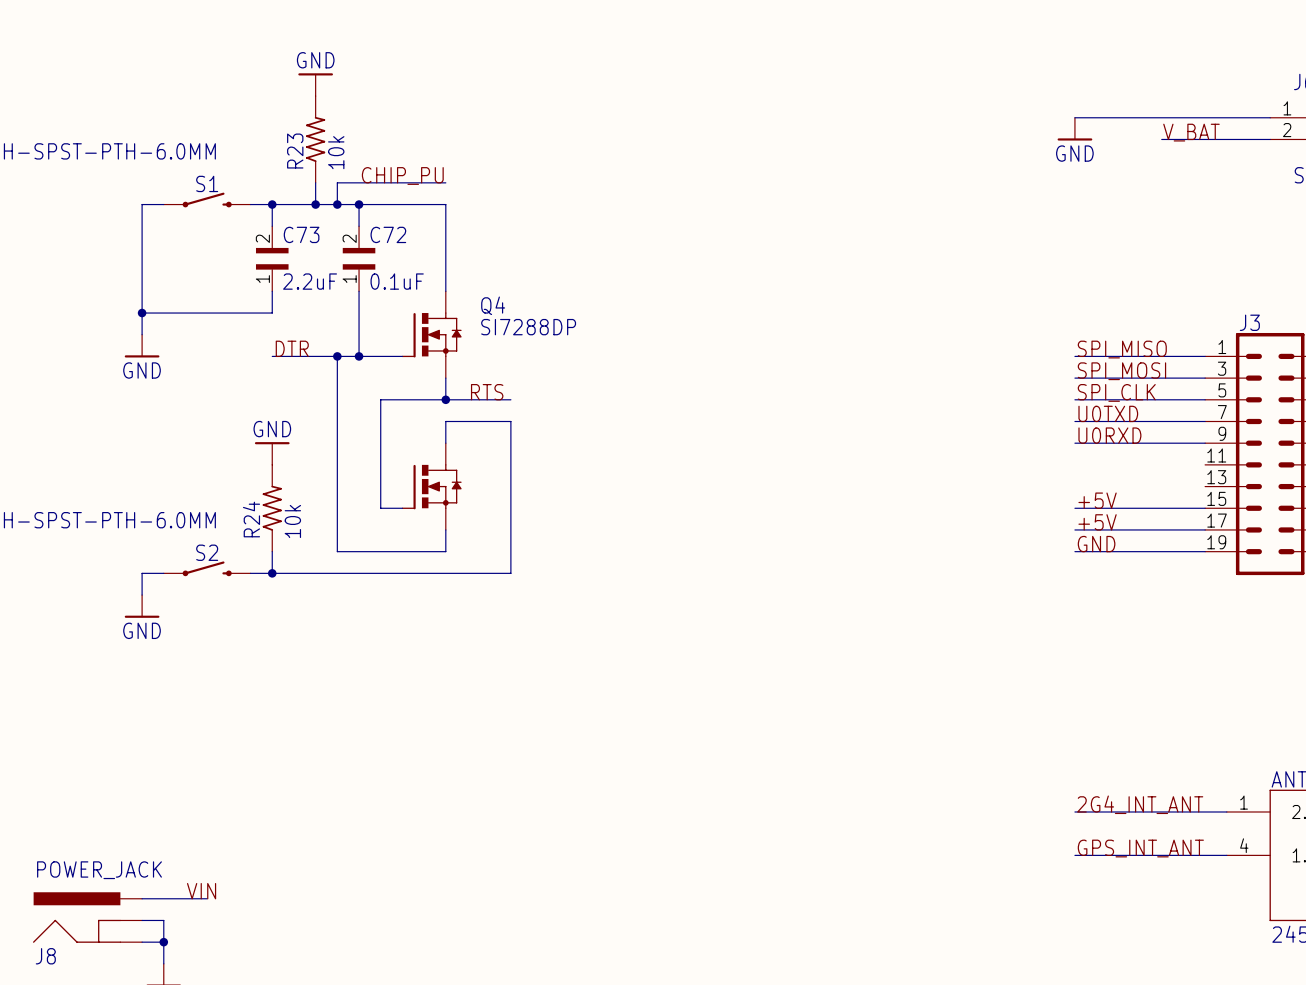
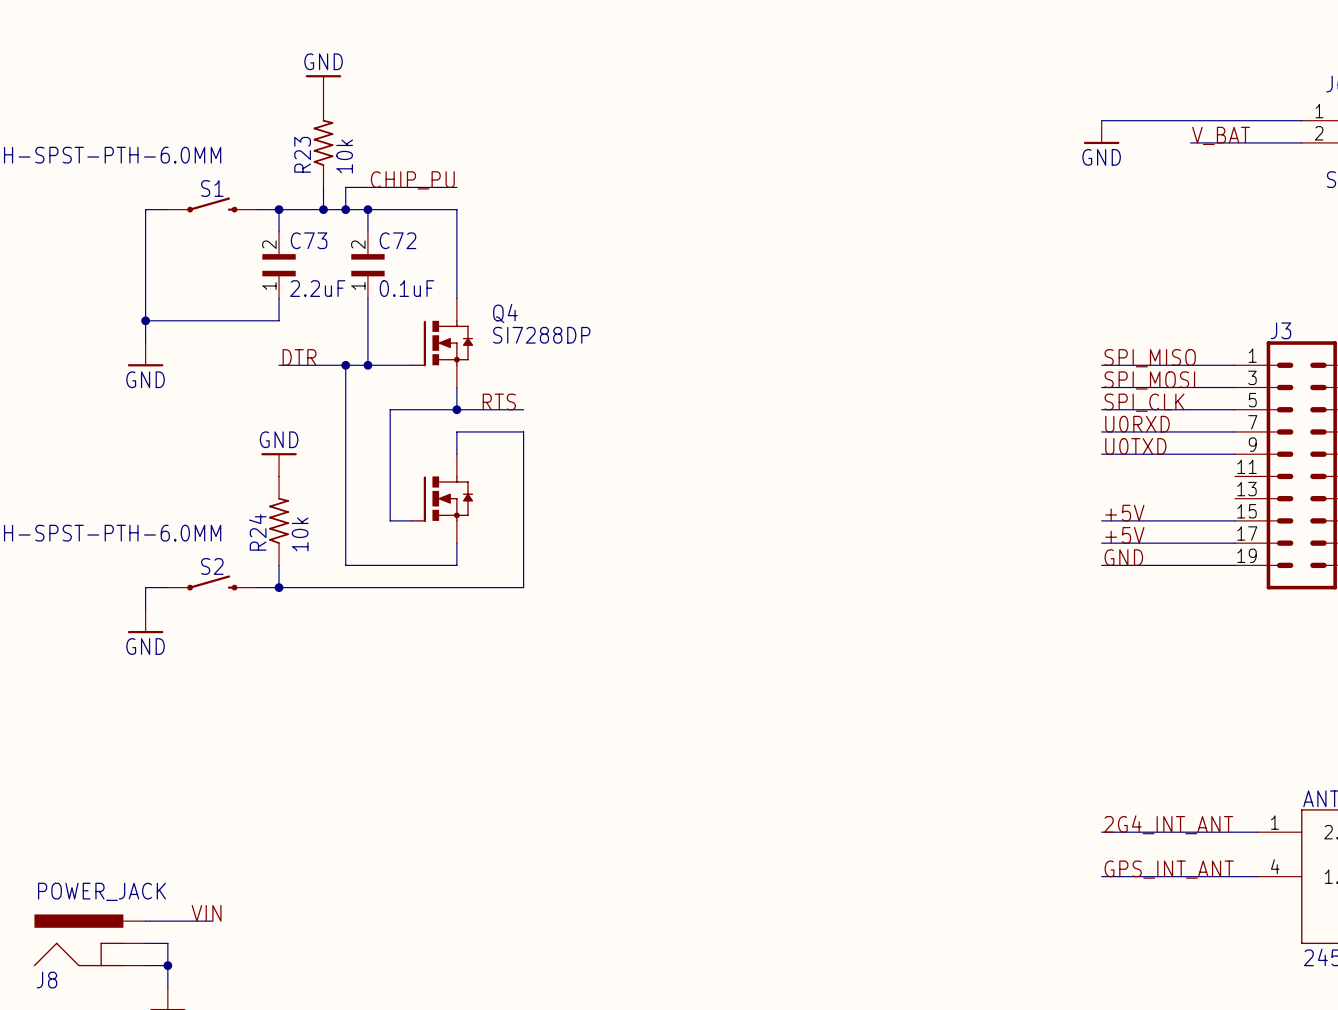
label: U0TXD (1108, 413) -> U0RXD (1137, 424)
label: U0RXD (1109, 435) -> U0TXD (1135, 446)

